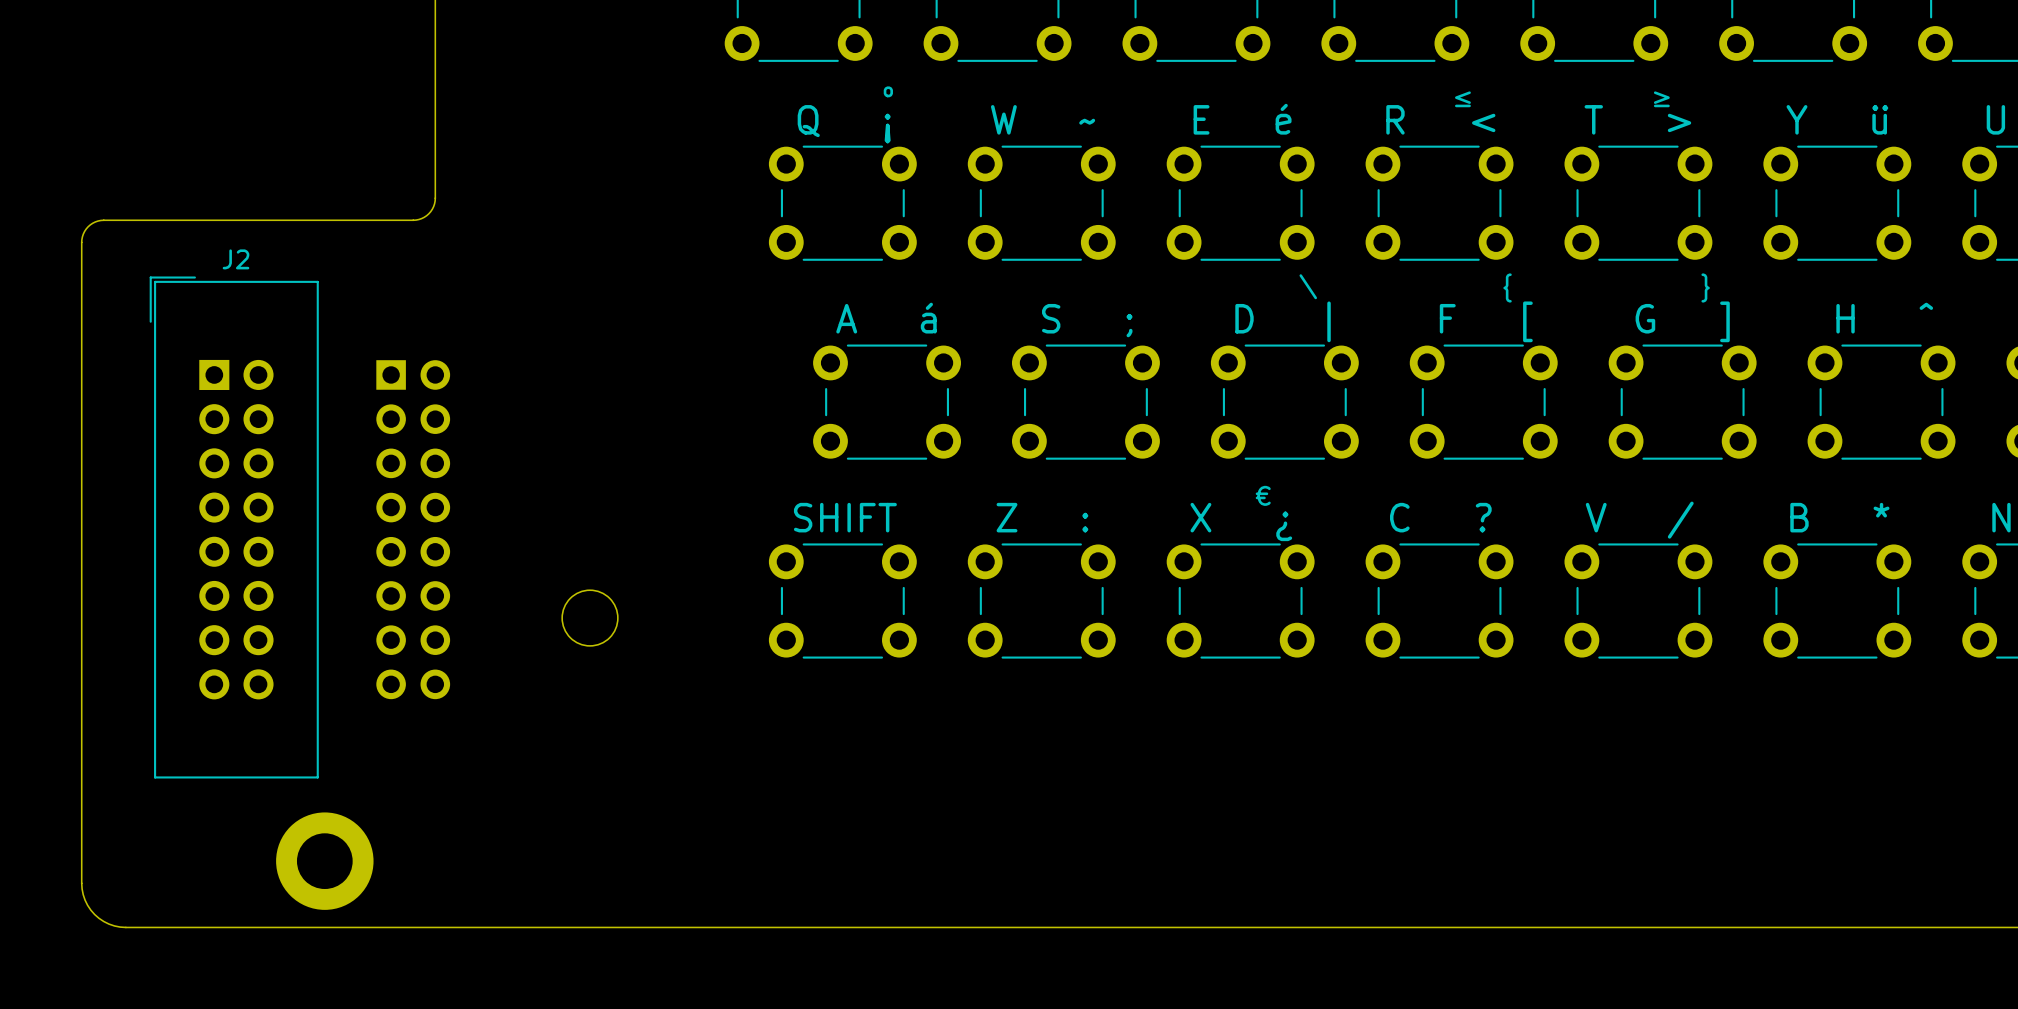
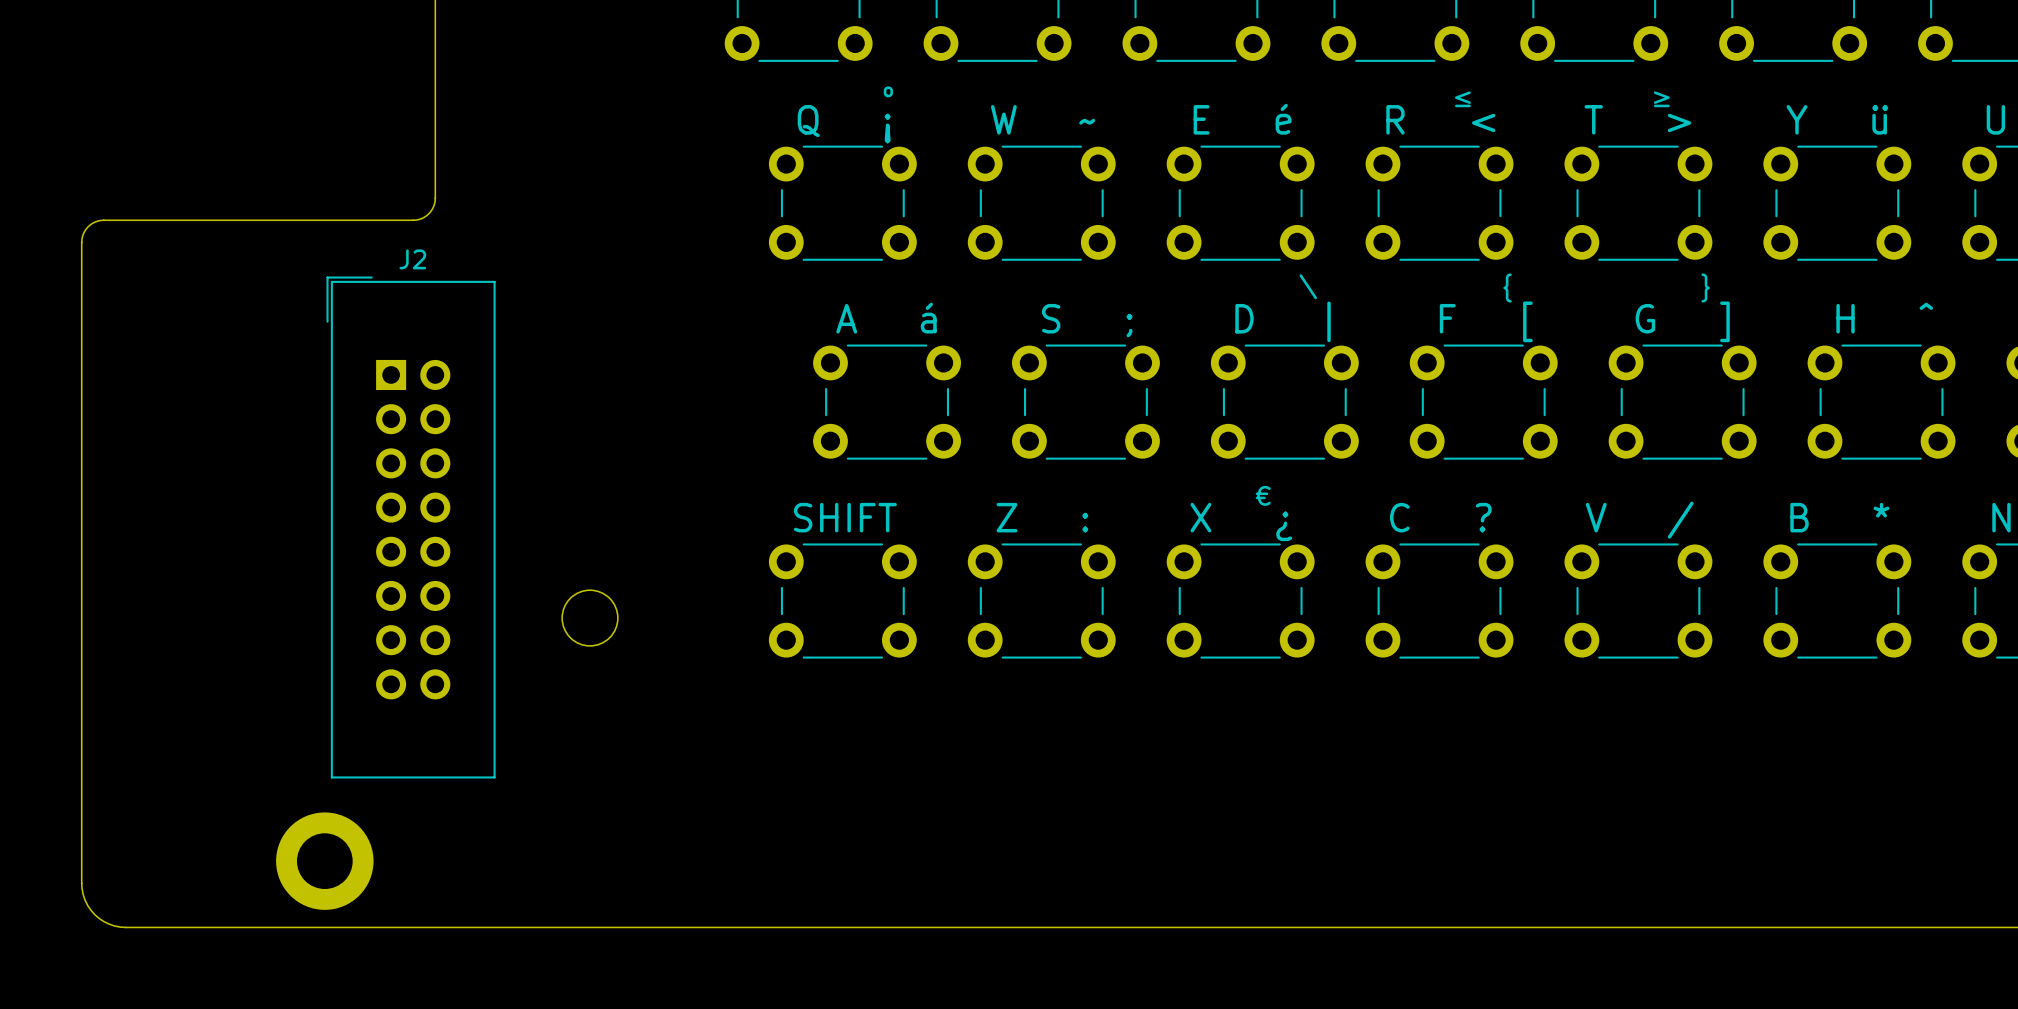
J2 position: (234, 527) -> (411, 527)
part: (413, 529) -> none

